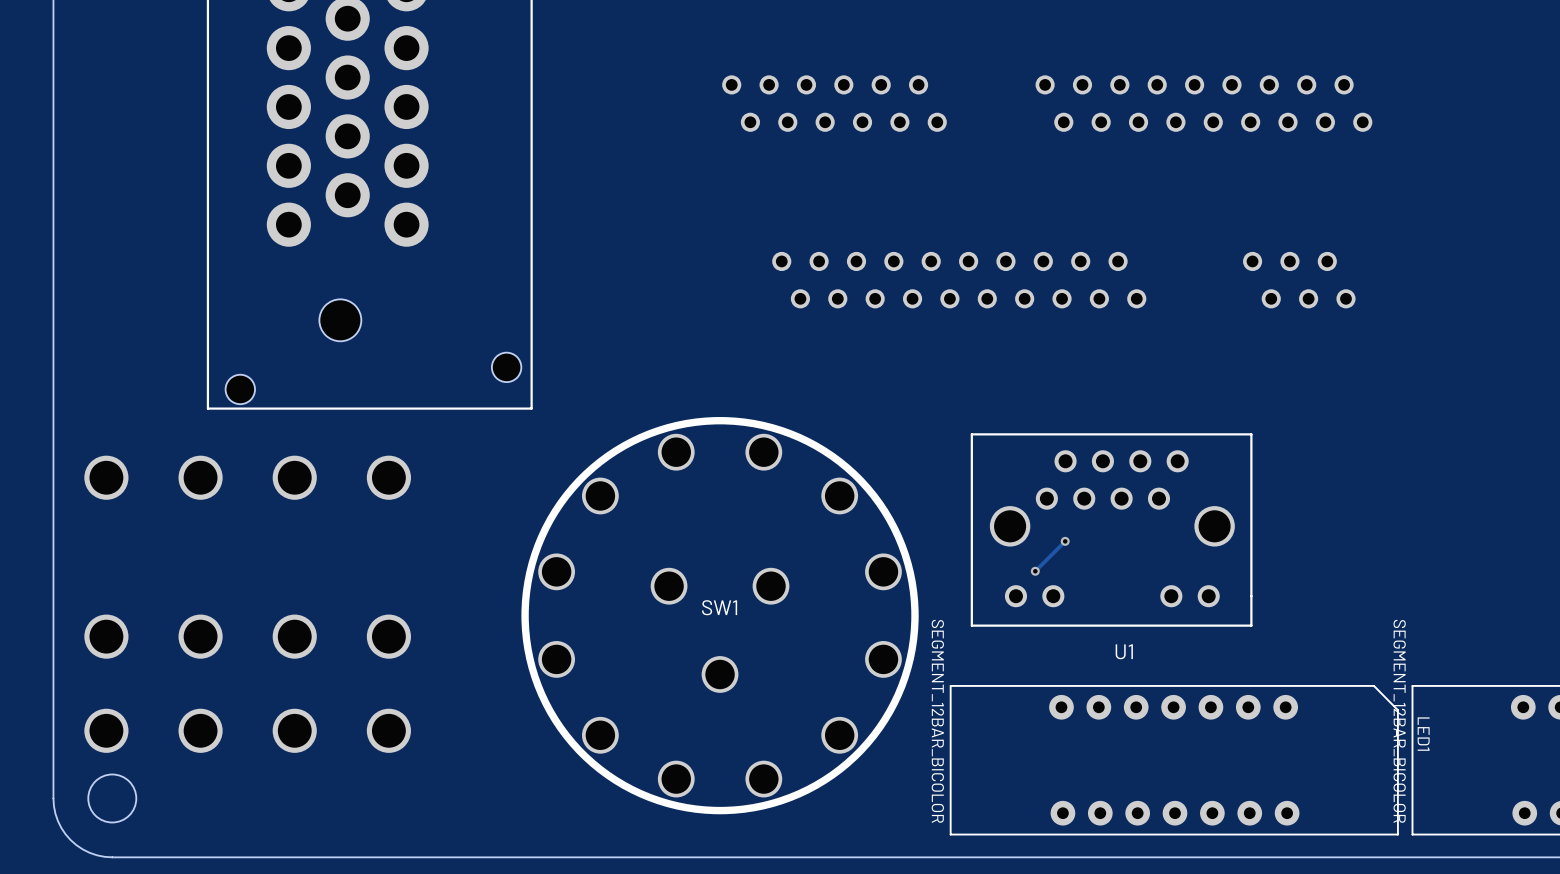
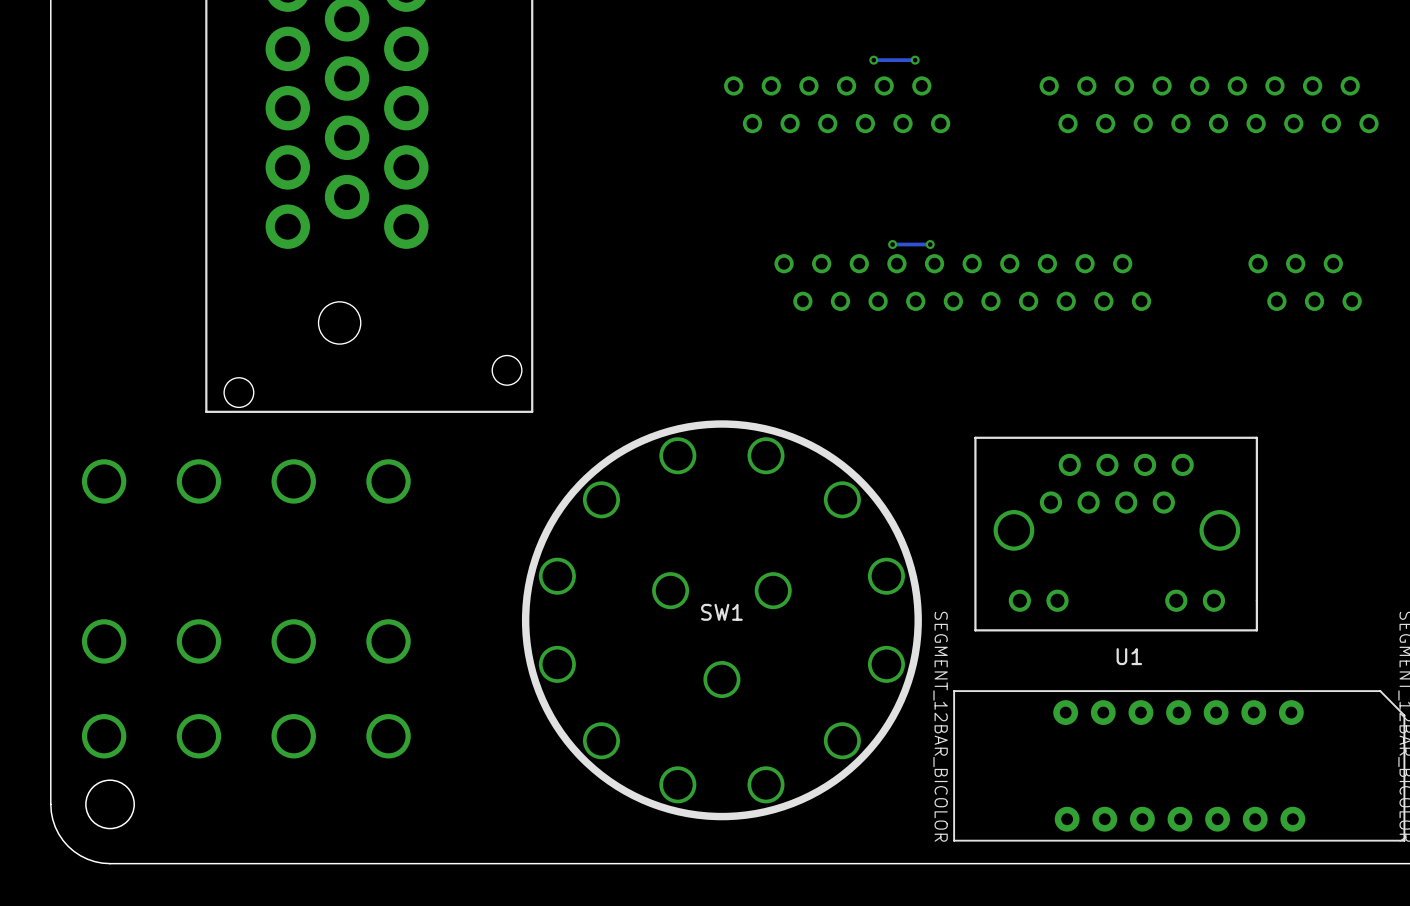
via: none -> (873, 60)
track: none -> (915, 60) (873, 60)
via: none -> (915, 60)
via: none -> (892, 244)
track: none -> (930, 244) (892, 244)
via: none -> (930, 244)
track: (1065, 541) (1035, 571) -> none
via: (1065, 541) -> none
via: (1035, 571) -> none

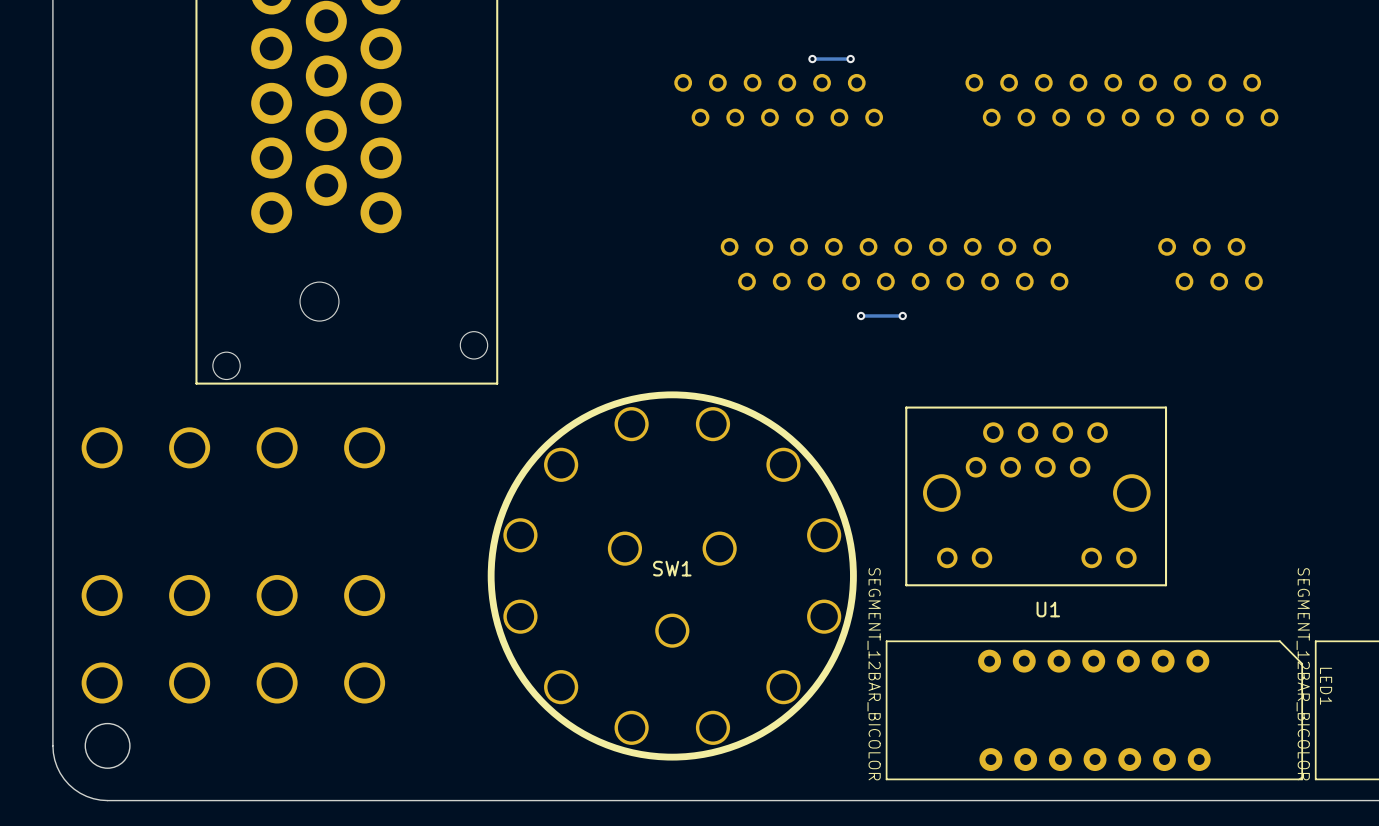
via: (892, 244) -> none
track: (930, 244) (892, 244) -> none
via: (930, 244) -> none
via: none -> (861, 315)
track: none -> (902, 315) (861, 315)
via: none -> (902, 315)

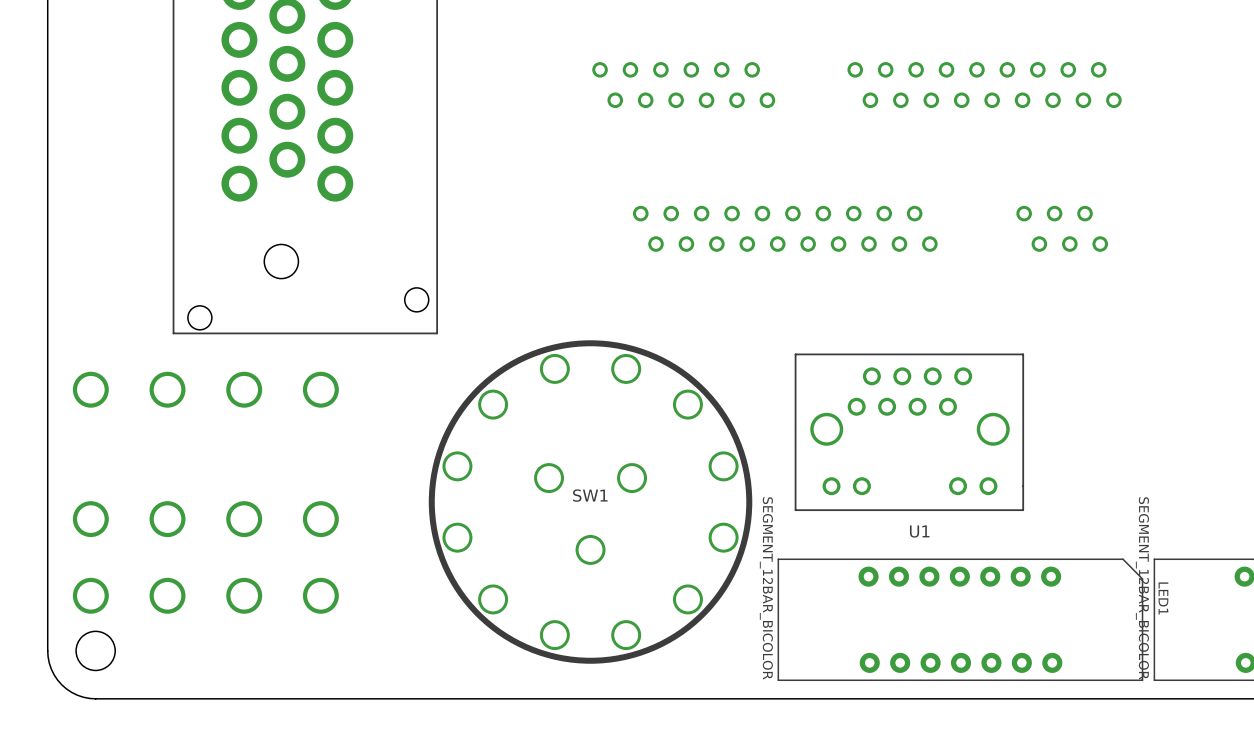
via: (812, 59) -> none
track: (850, 59) (812, 59) -> none
via: (850, 59) -> none
via: (861, 315) -> none
track: (902, 315) (861, 315) -> none
via: (902, 315) -> none

